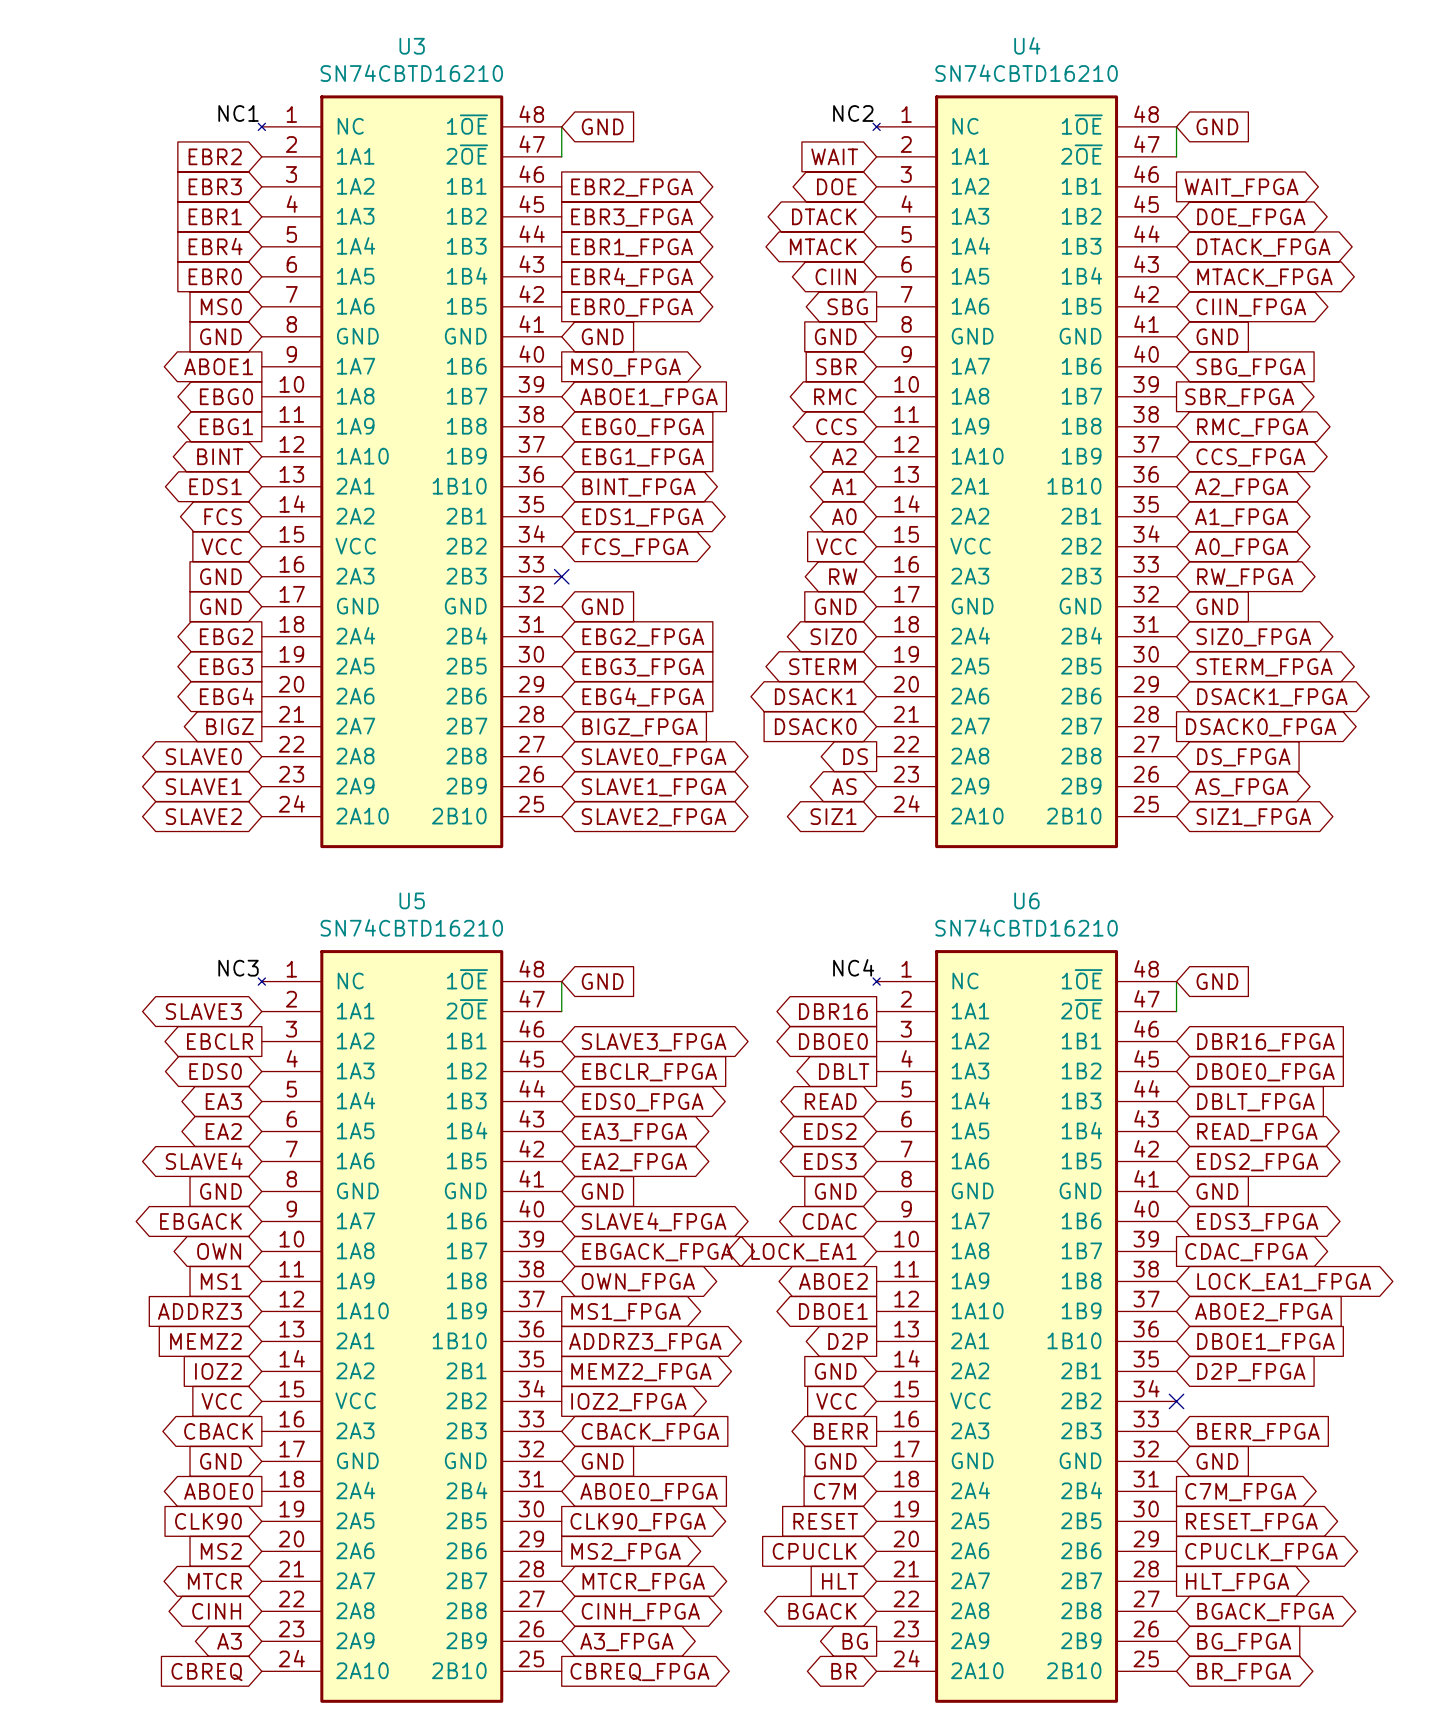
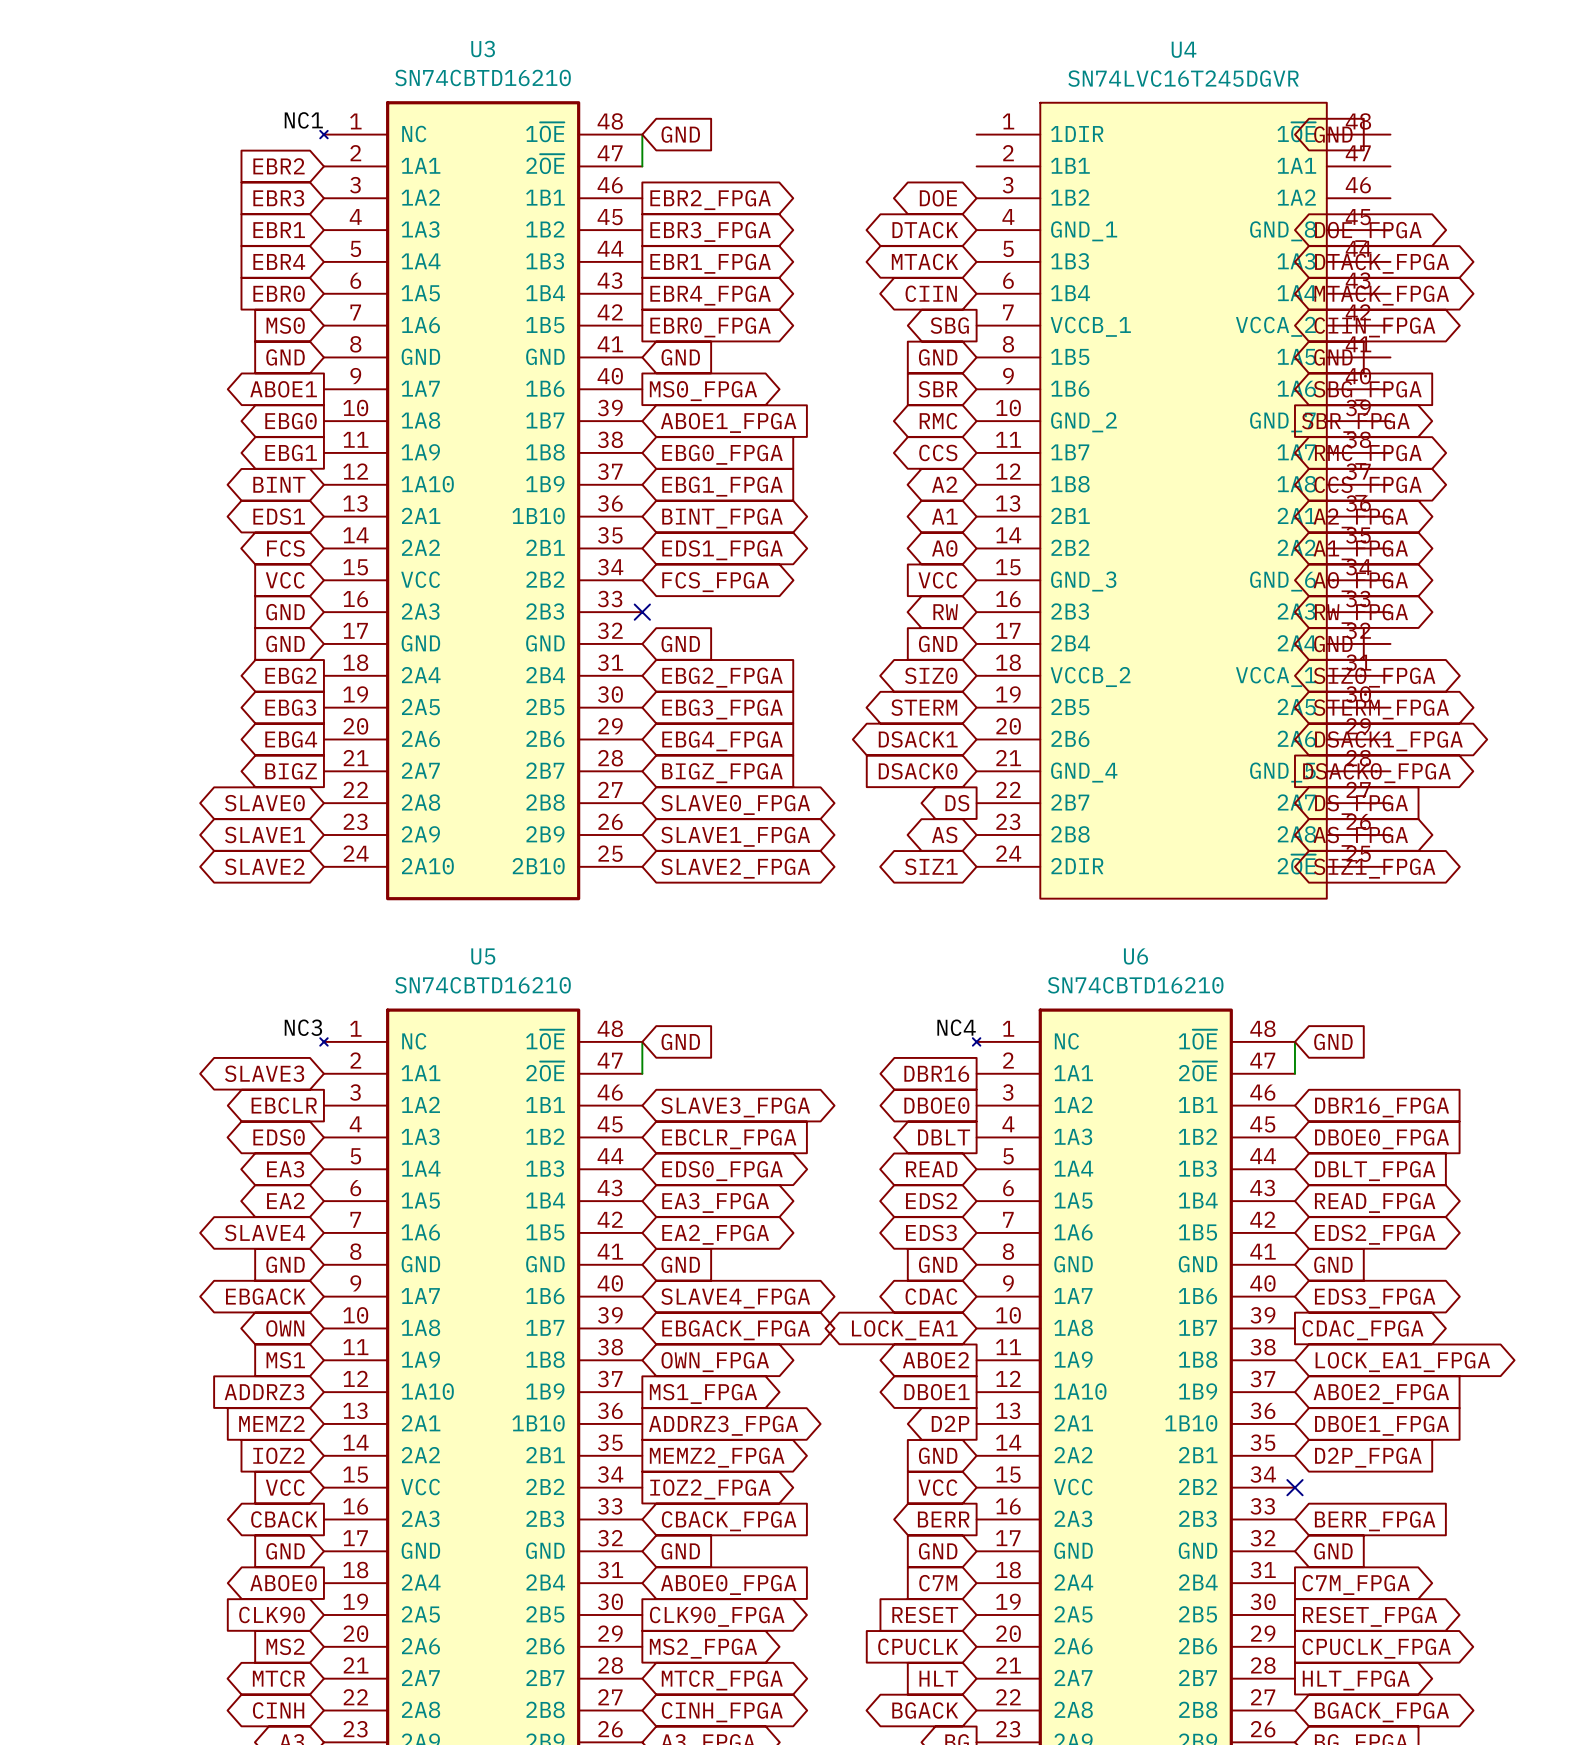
U4 value: SN74CBTD16210 (1026, 73) -> SN74LVC16T245DGVR (1183, 78)
U4 symbol: [873, 95, 1177, 849] -> [976, 101, 1391, 900]
label: NC2 (853, 113) -> none
global label: WAIT (834, 156) -> none
global label: WAIT_FPGA (1241, 187) -> none

